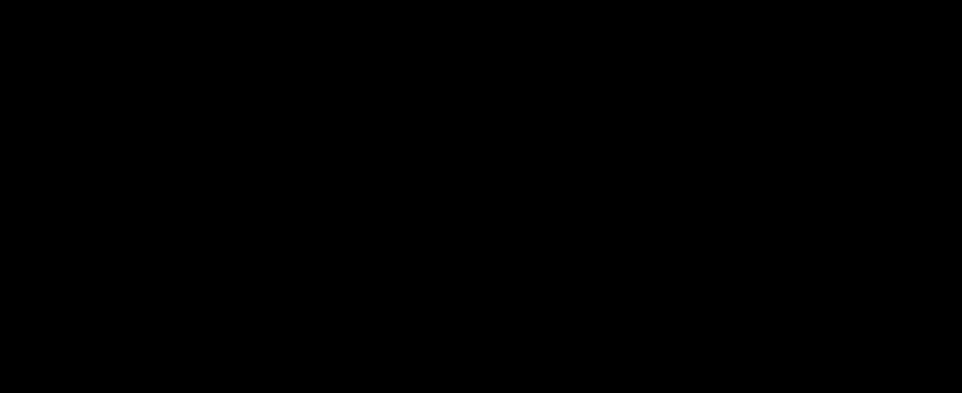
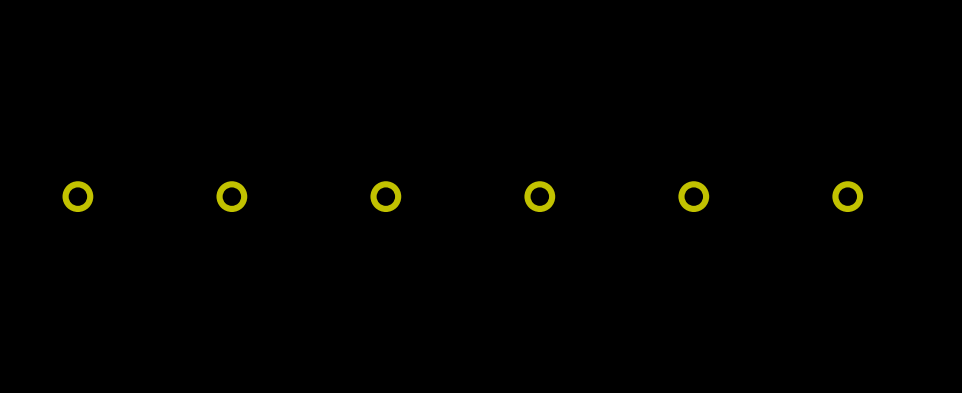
part: none -> (77, 196)
part: none -> (231, 196)
part: none -> (385, 196)
part: none -> (539, 196)
part: none -> (693, 196)
part: none -> (847, 196)

